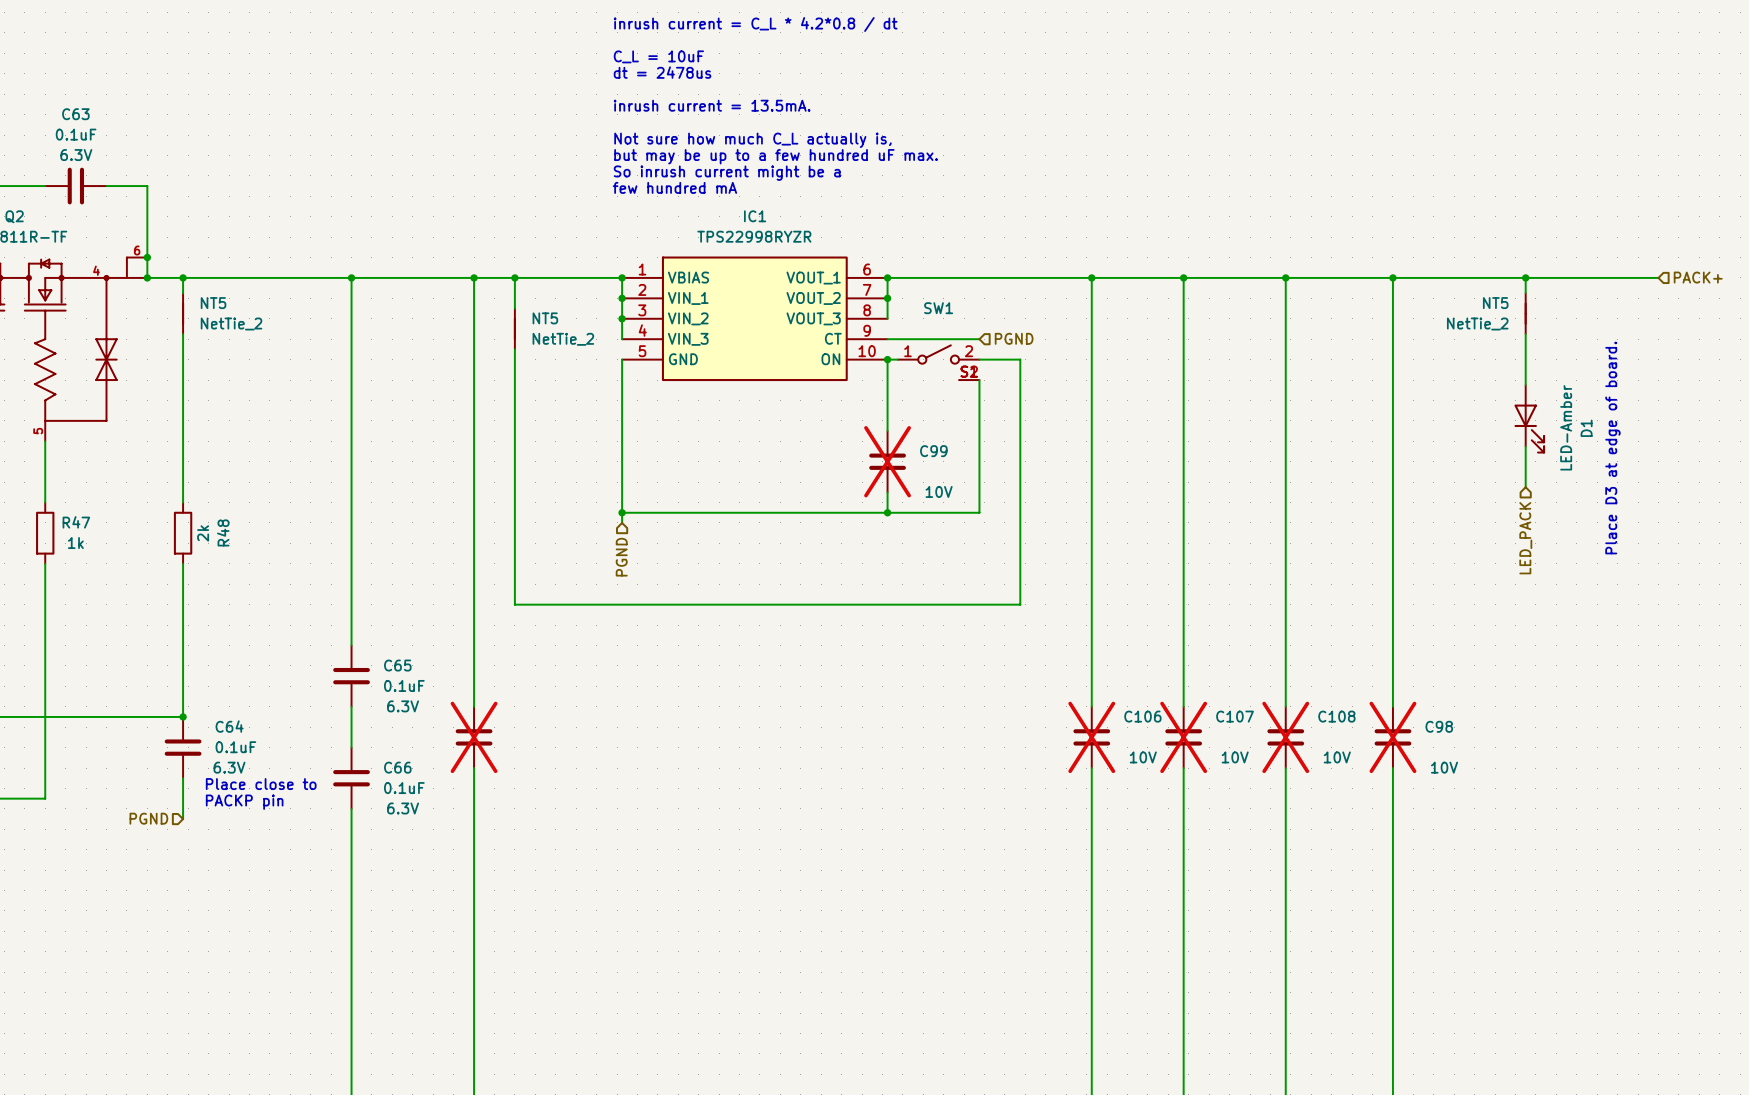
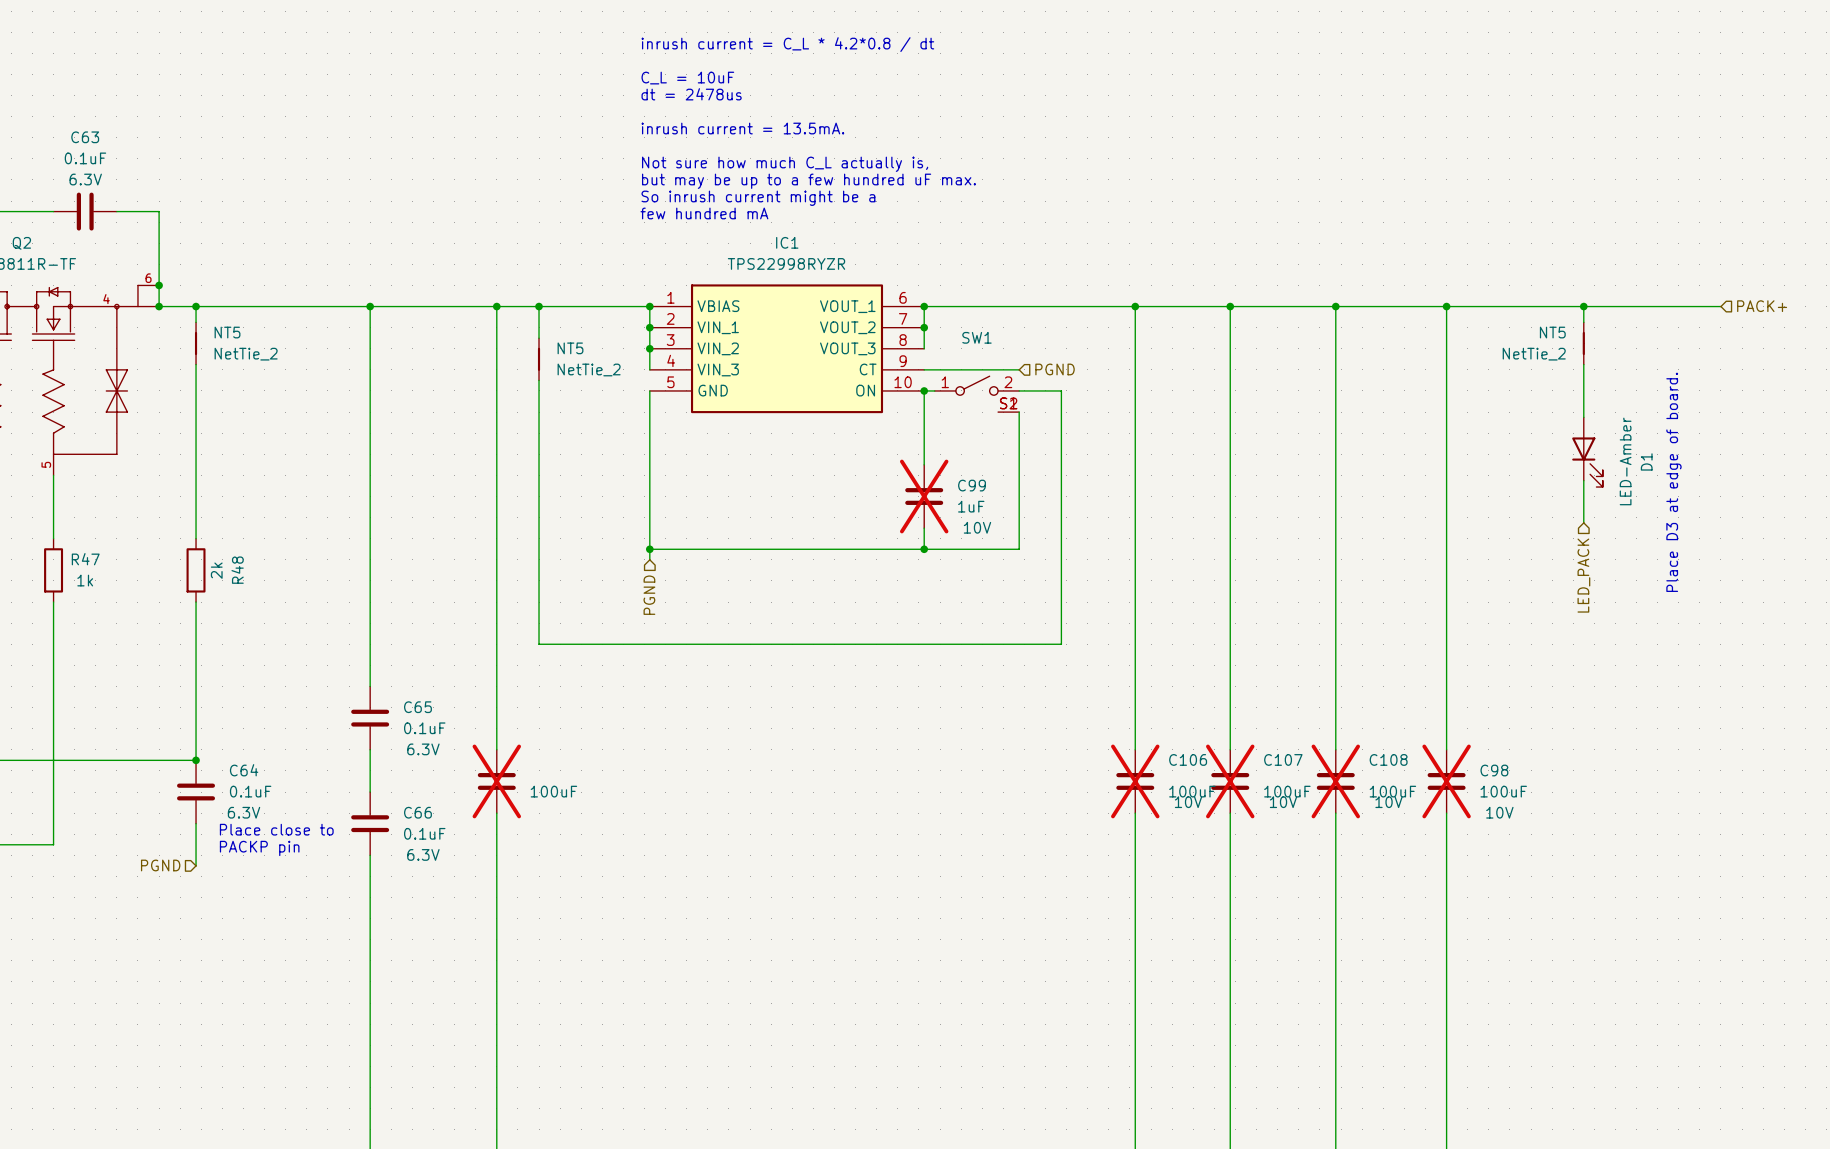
C99 value: none -> 1uF (971, 506)
part value: none -> 100uF (553, 791)
C106 value: none -> 100uF (1192, 791)
C107 value: none -> 100uF (1287, 791)
C108 value: none -> 100uF (1392, 791)
C98 value: none -> 100uF (1503, 791)

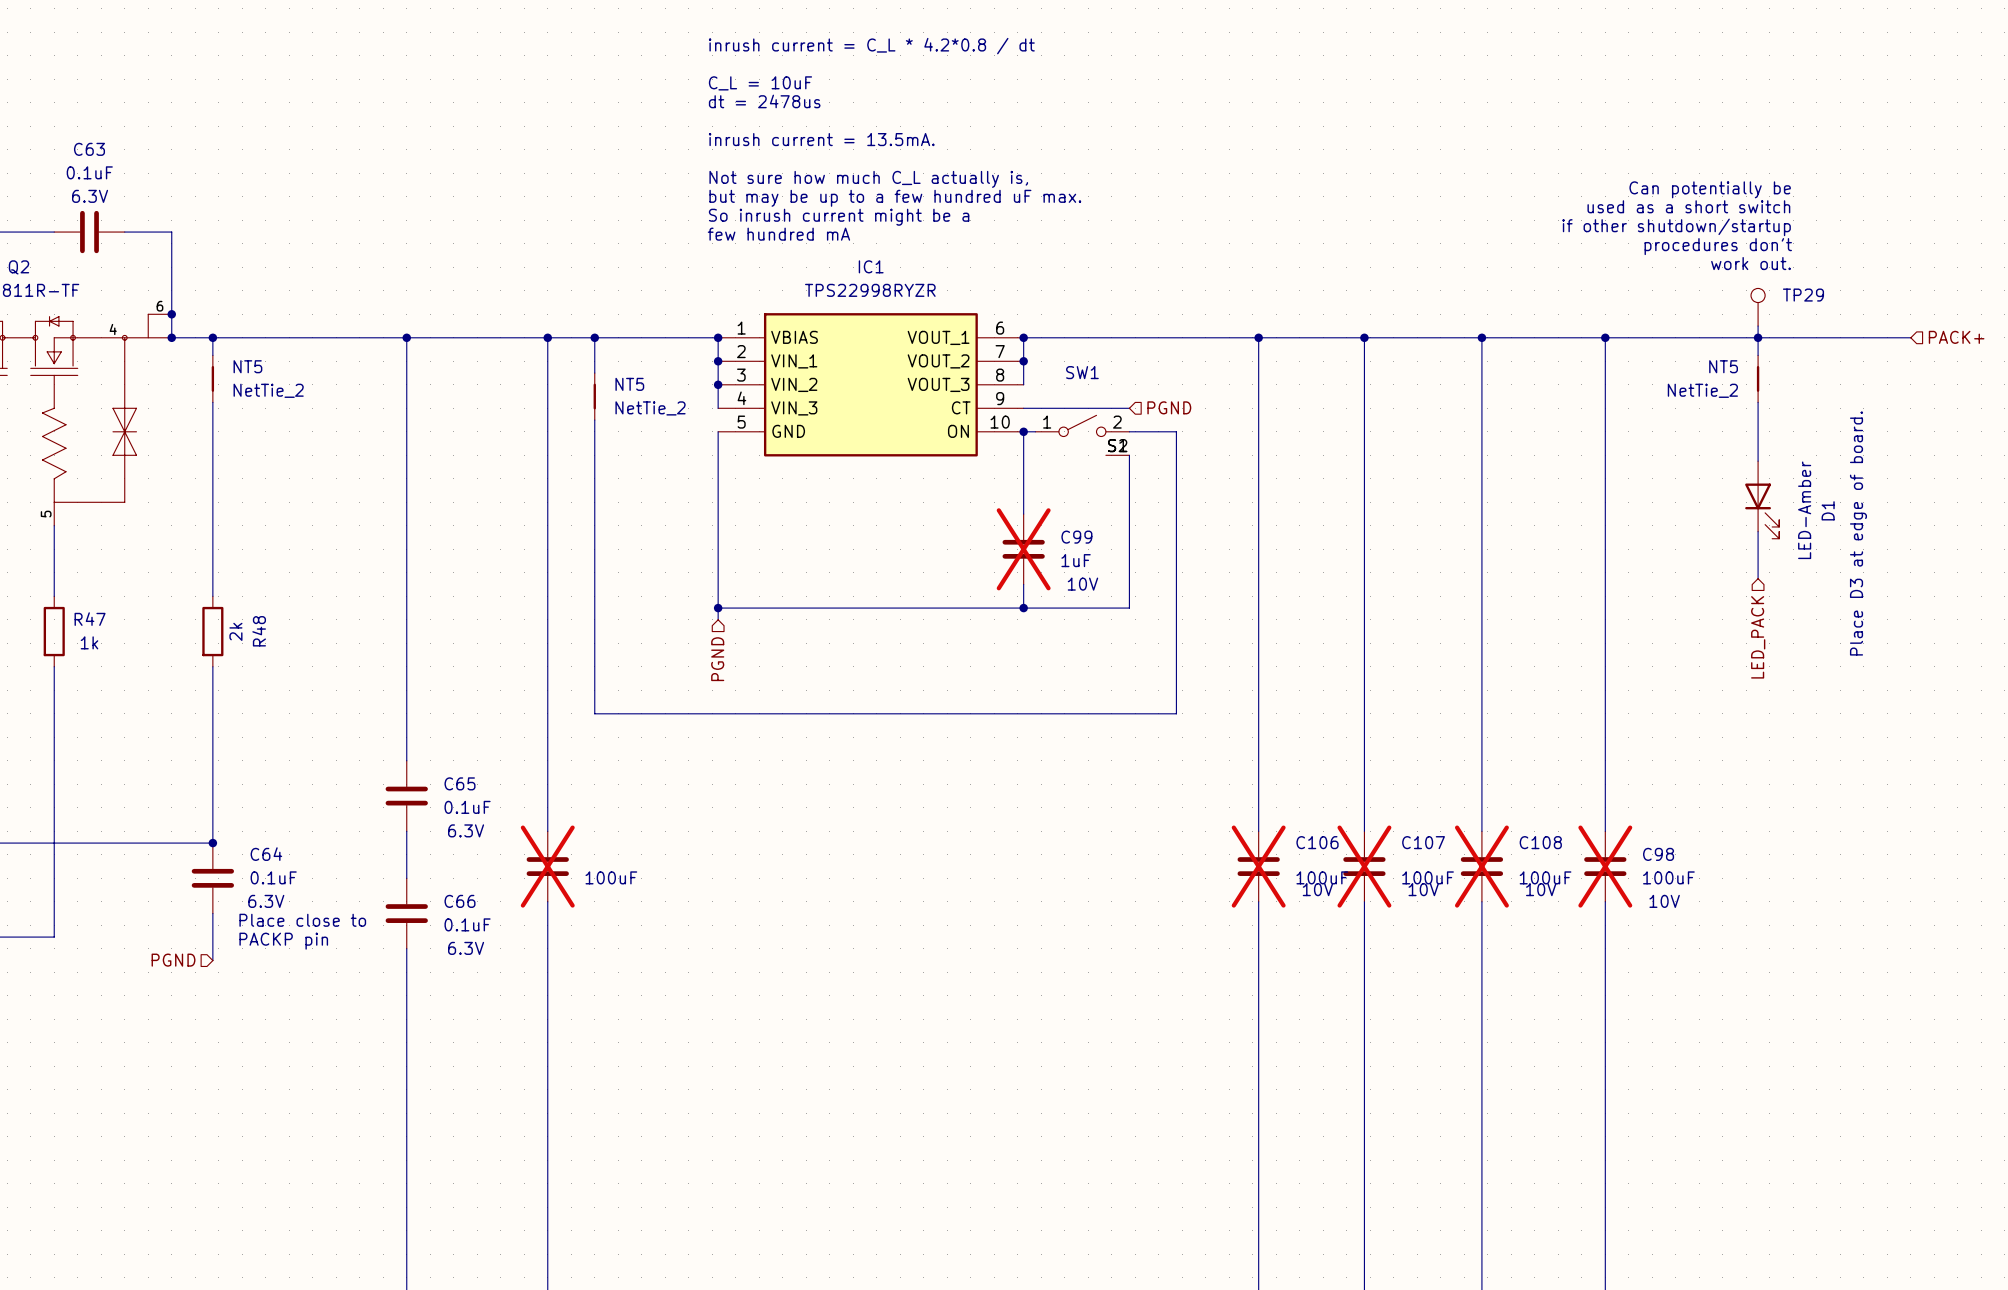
text: none -> Can potentially be (1710, 189)
text: none -> used as a short switch (1688, 206)
text: none -> if other shutdown/startup (1676, 227)
text: none -> procedures don't (1718, 246)
text: none -> work out. (1750, 263)
TP29: none -> (1758, 307)
wire: none -> (1758, 326) (1758, 337)

